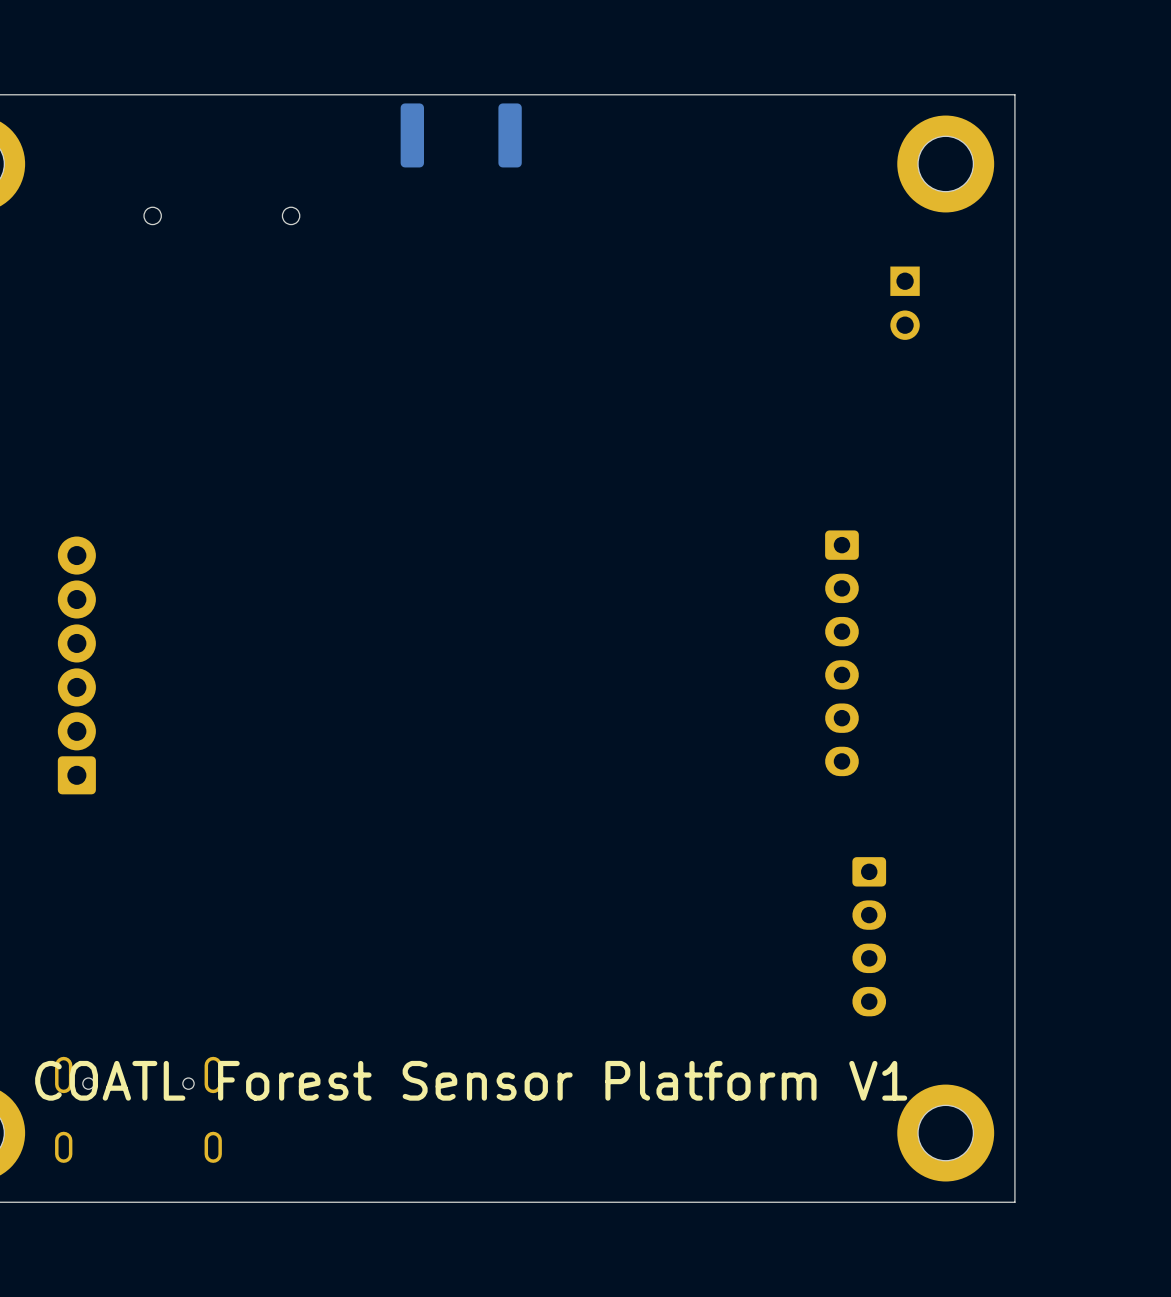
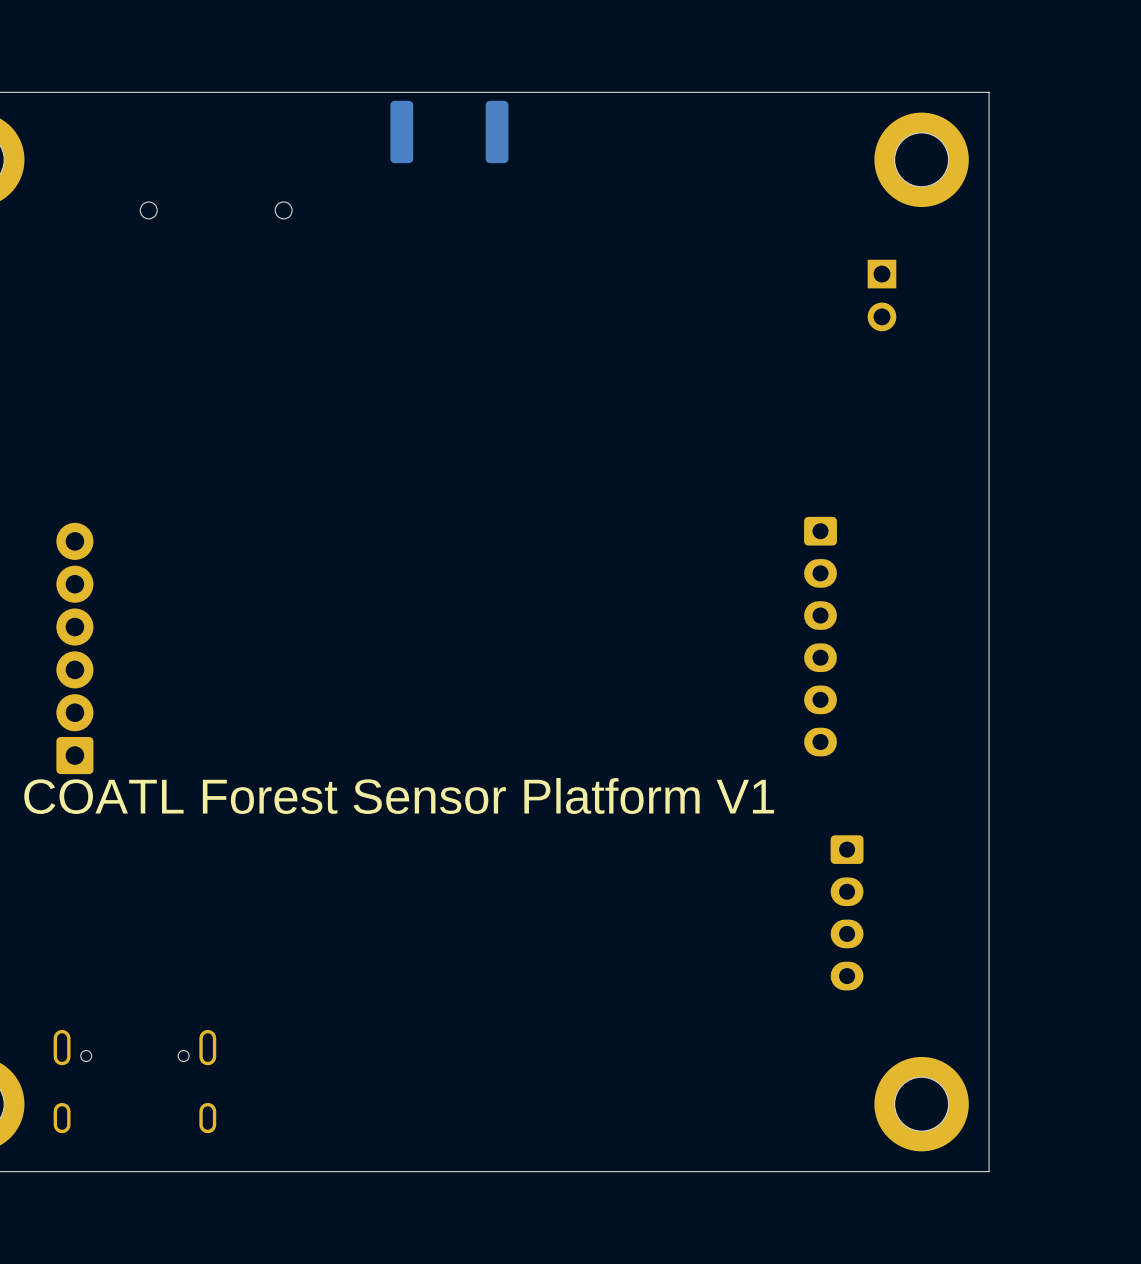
text position: COATL Forest Sensor Platform V1 (471, 1080) -> COATL Forest Sensor Platform V1 (399, 796)

